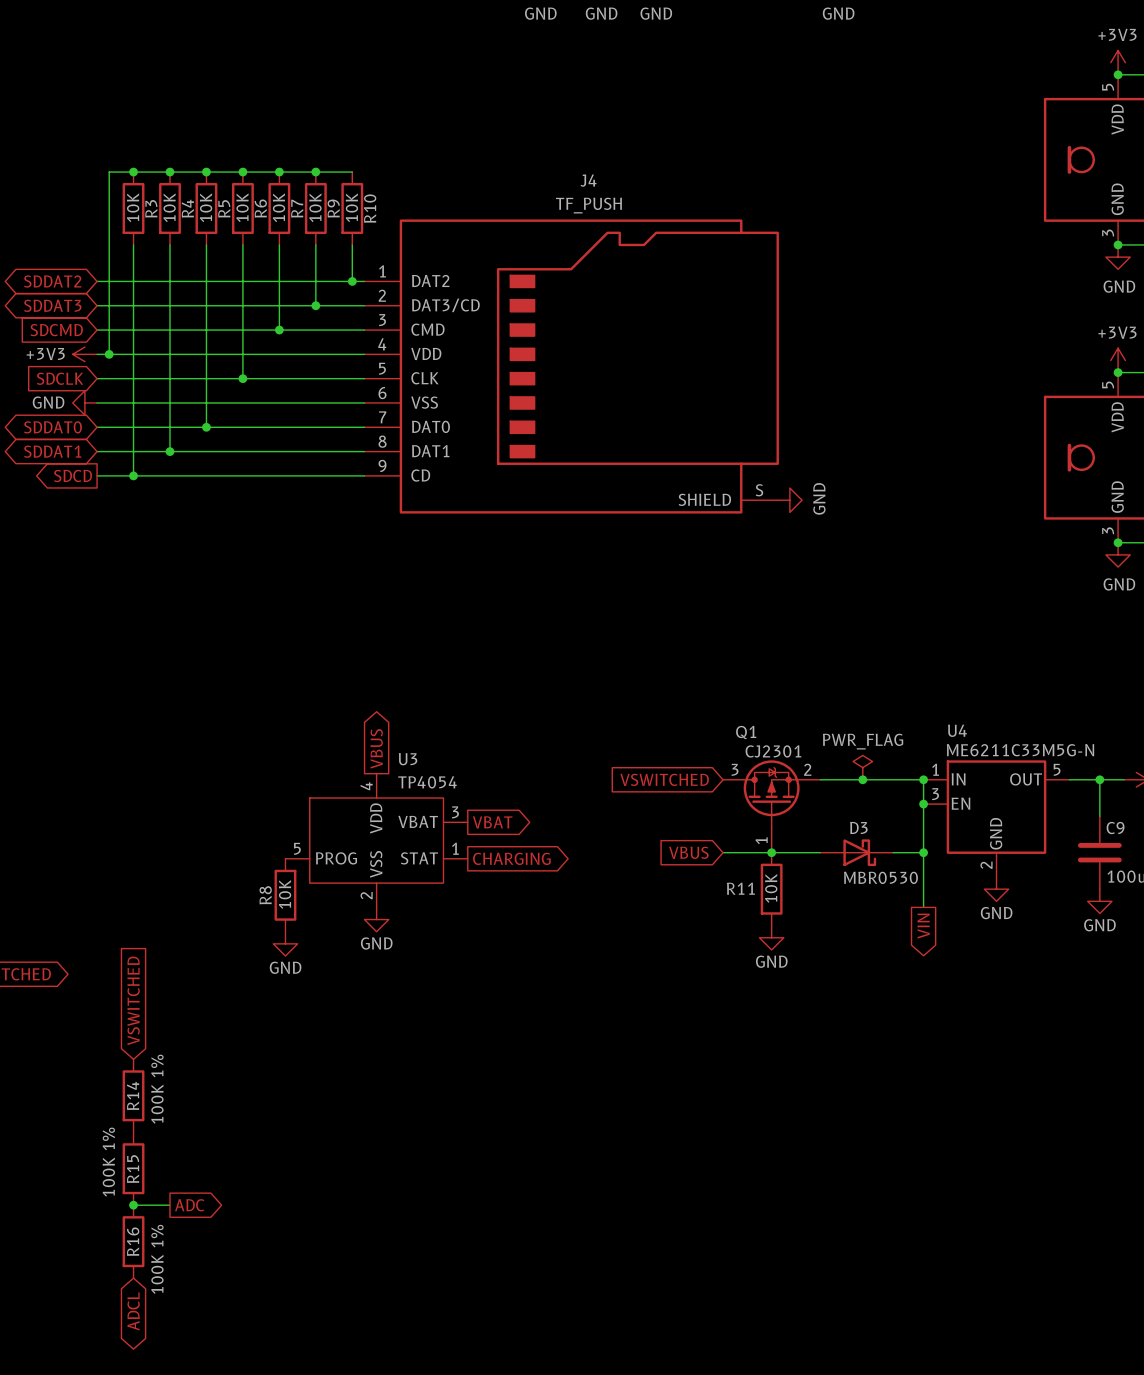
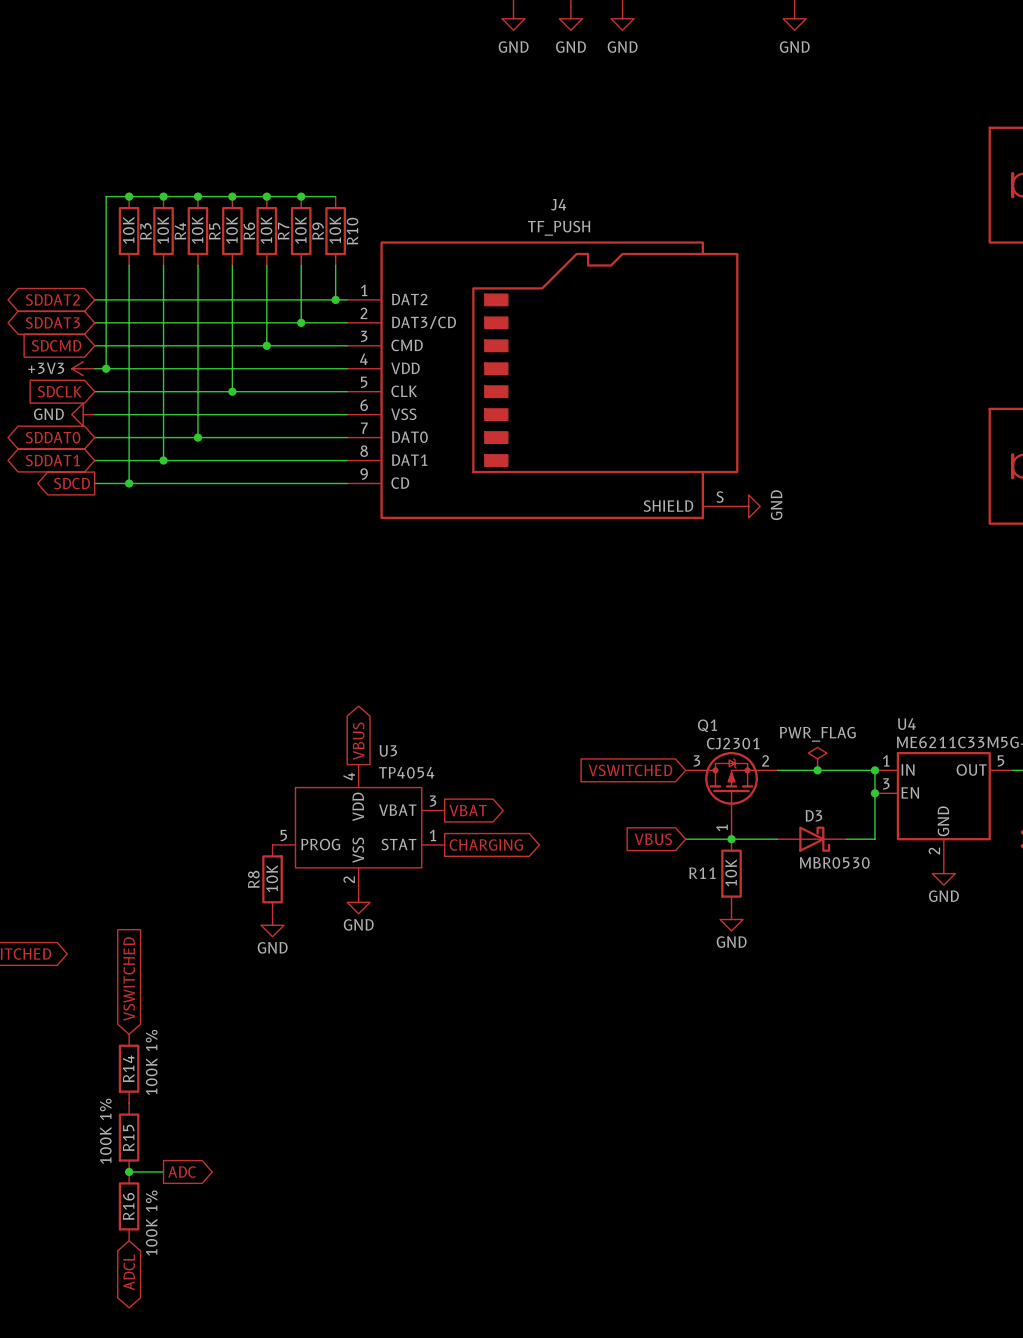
wire: (923, 852) (923, 907) -> none
junction: (923, 852) -> none
global label: VIN (923, 926) -> none

